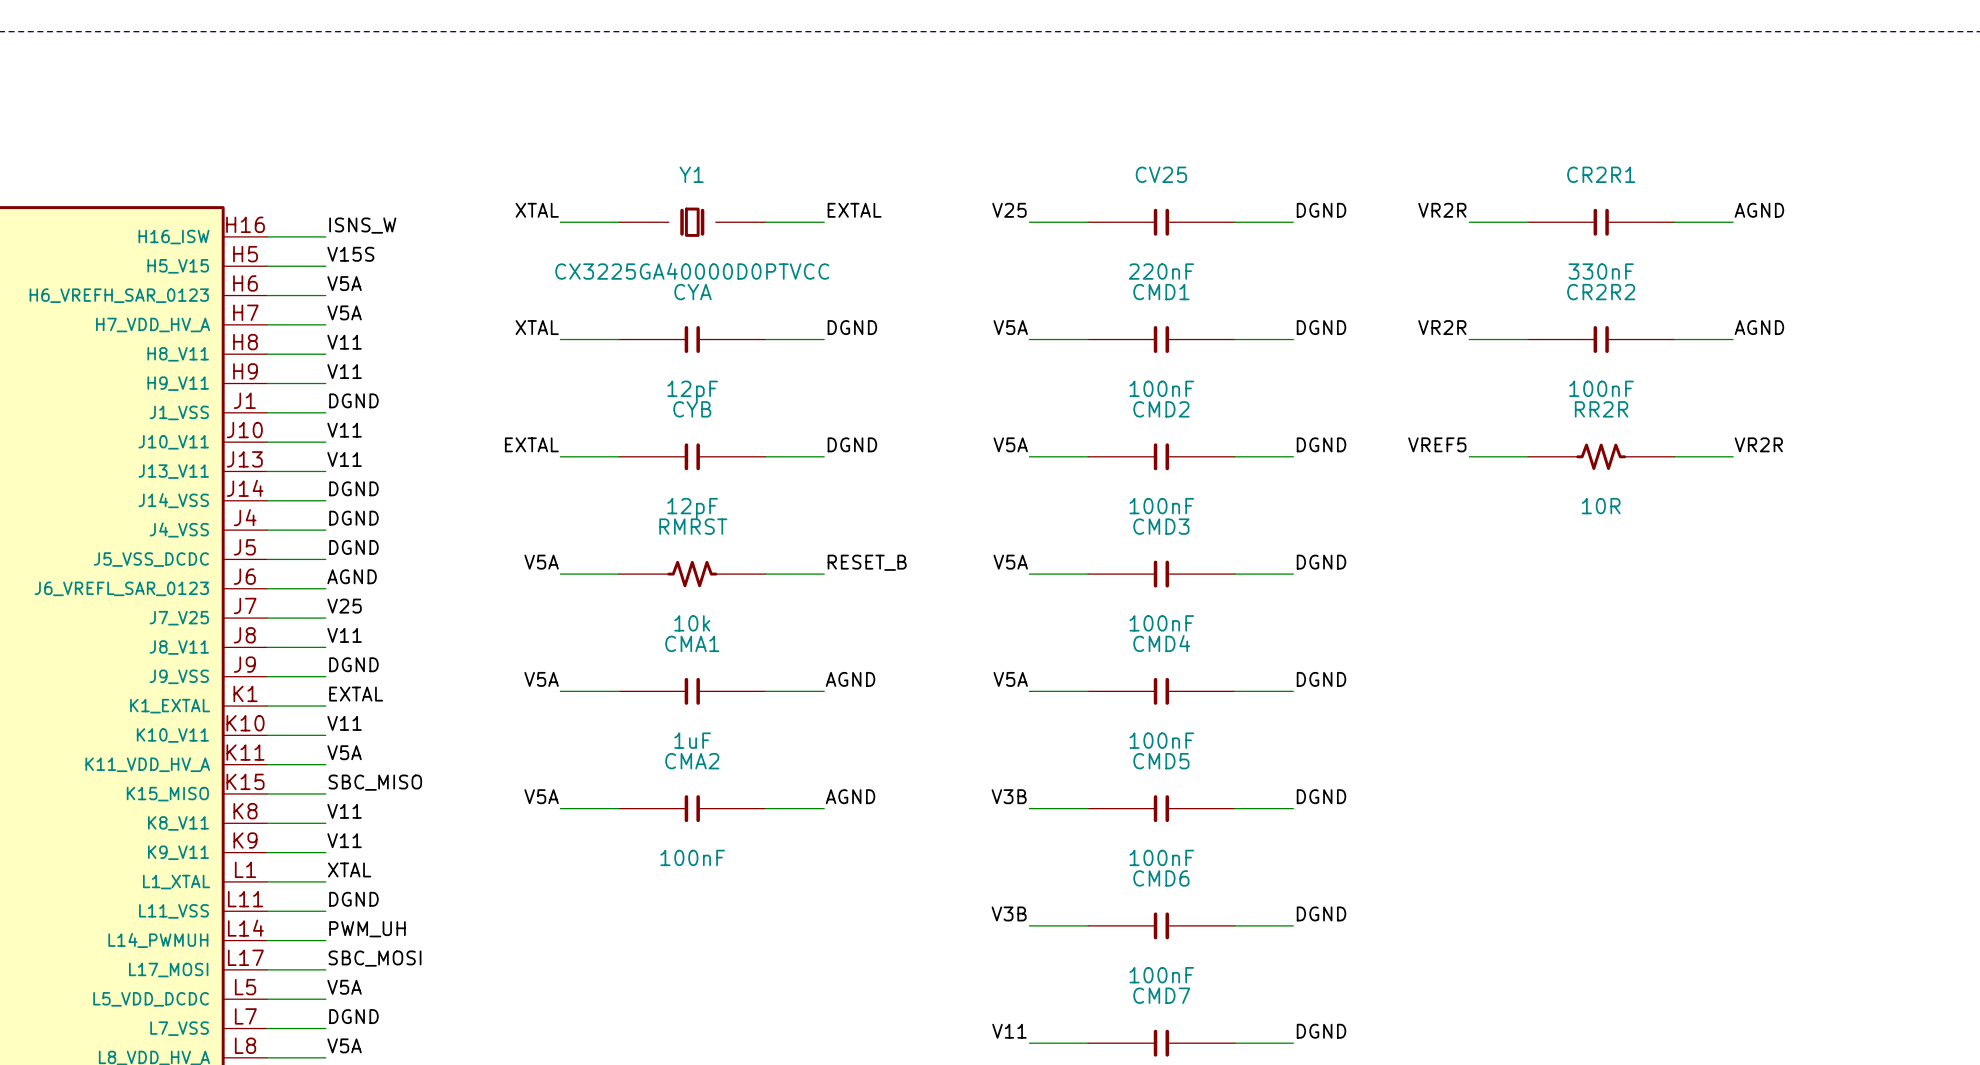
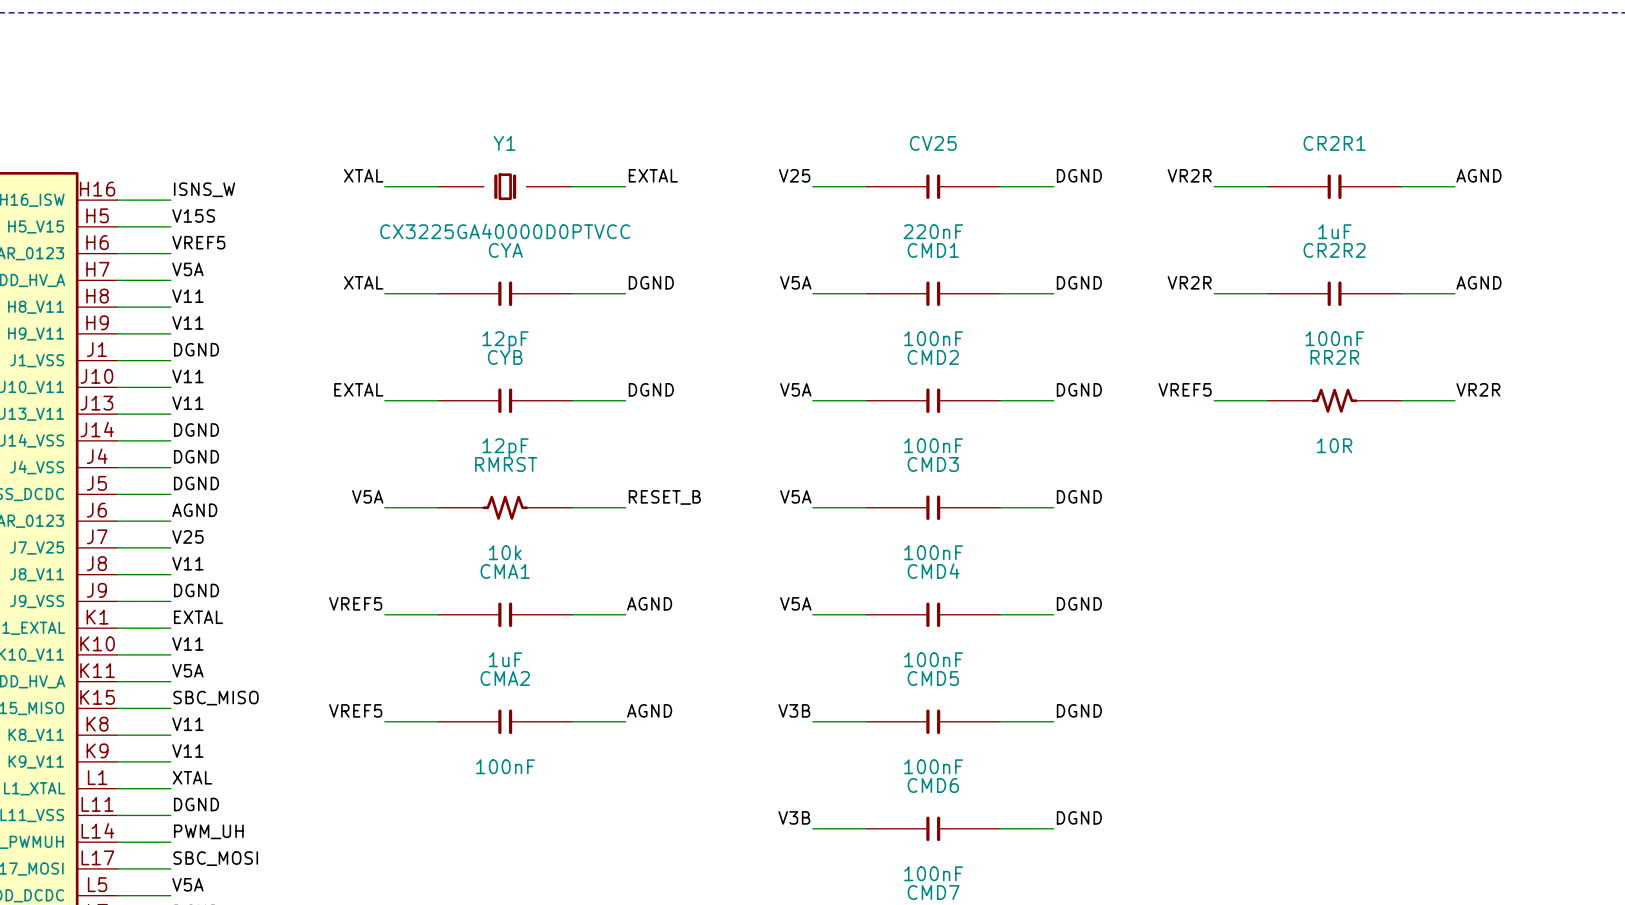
CR2R1 value: 330nF (1601, 271) -> 1uF (1334, 231)
label: V5A (344, 283) -> VREF5 (198, 242)
label: V5A (541, 679) -> VREF5 (355, 603)
label: V5A (541, 796) -> VREF5 (355, 710)

